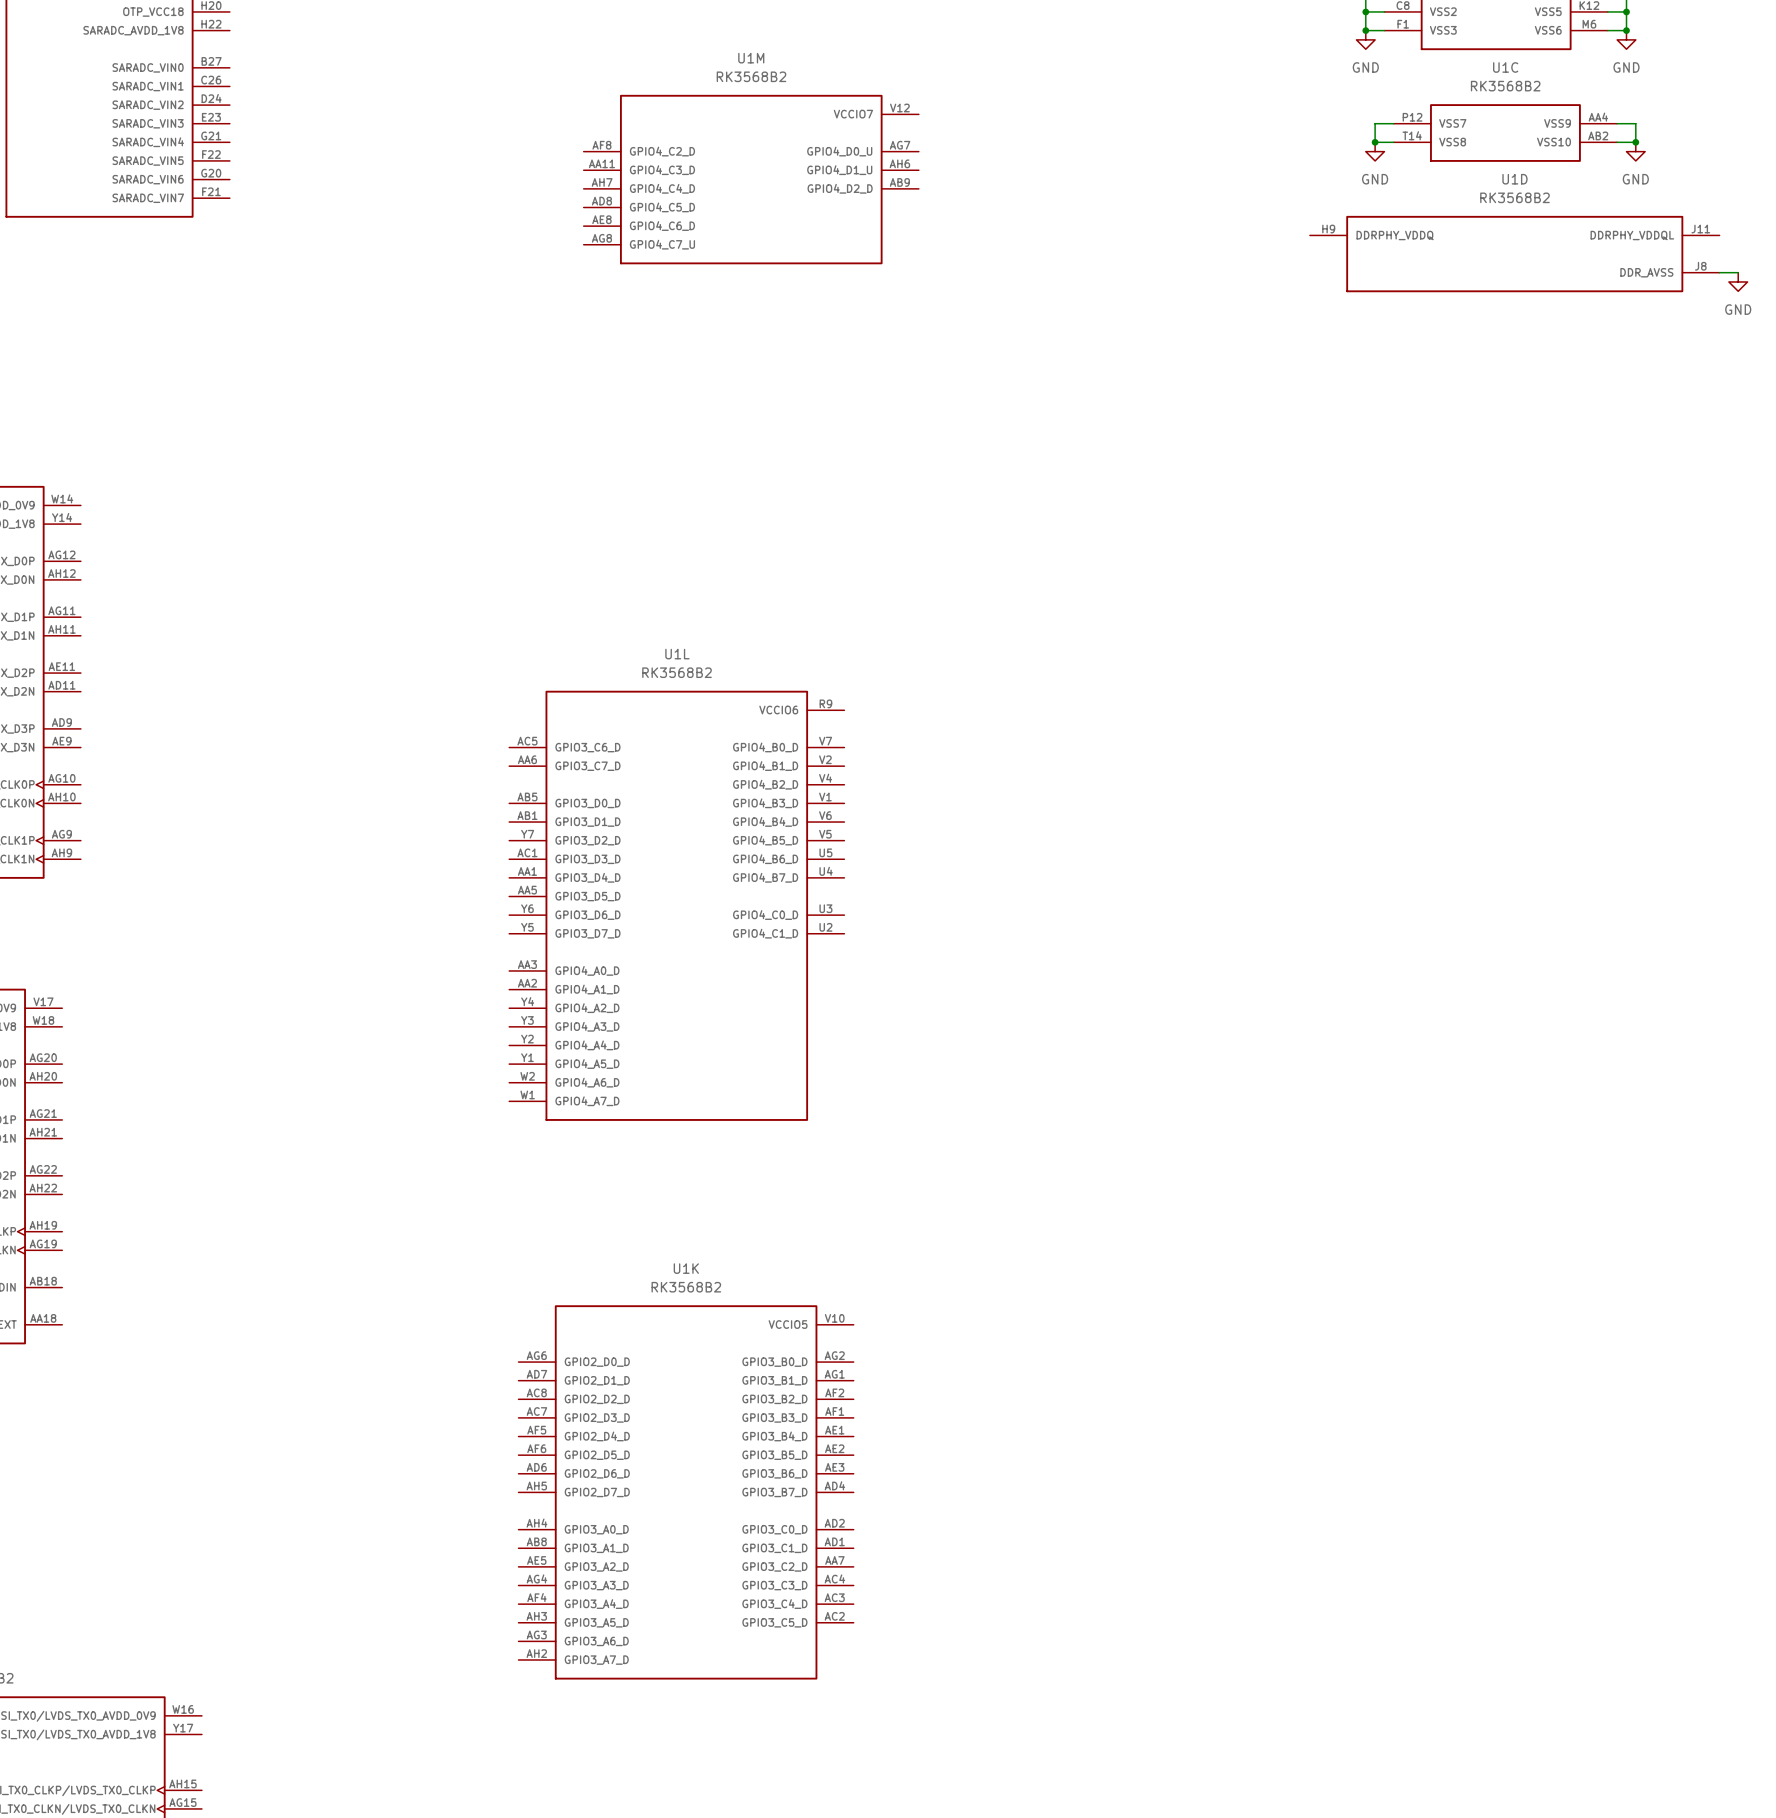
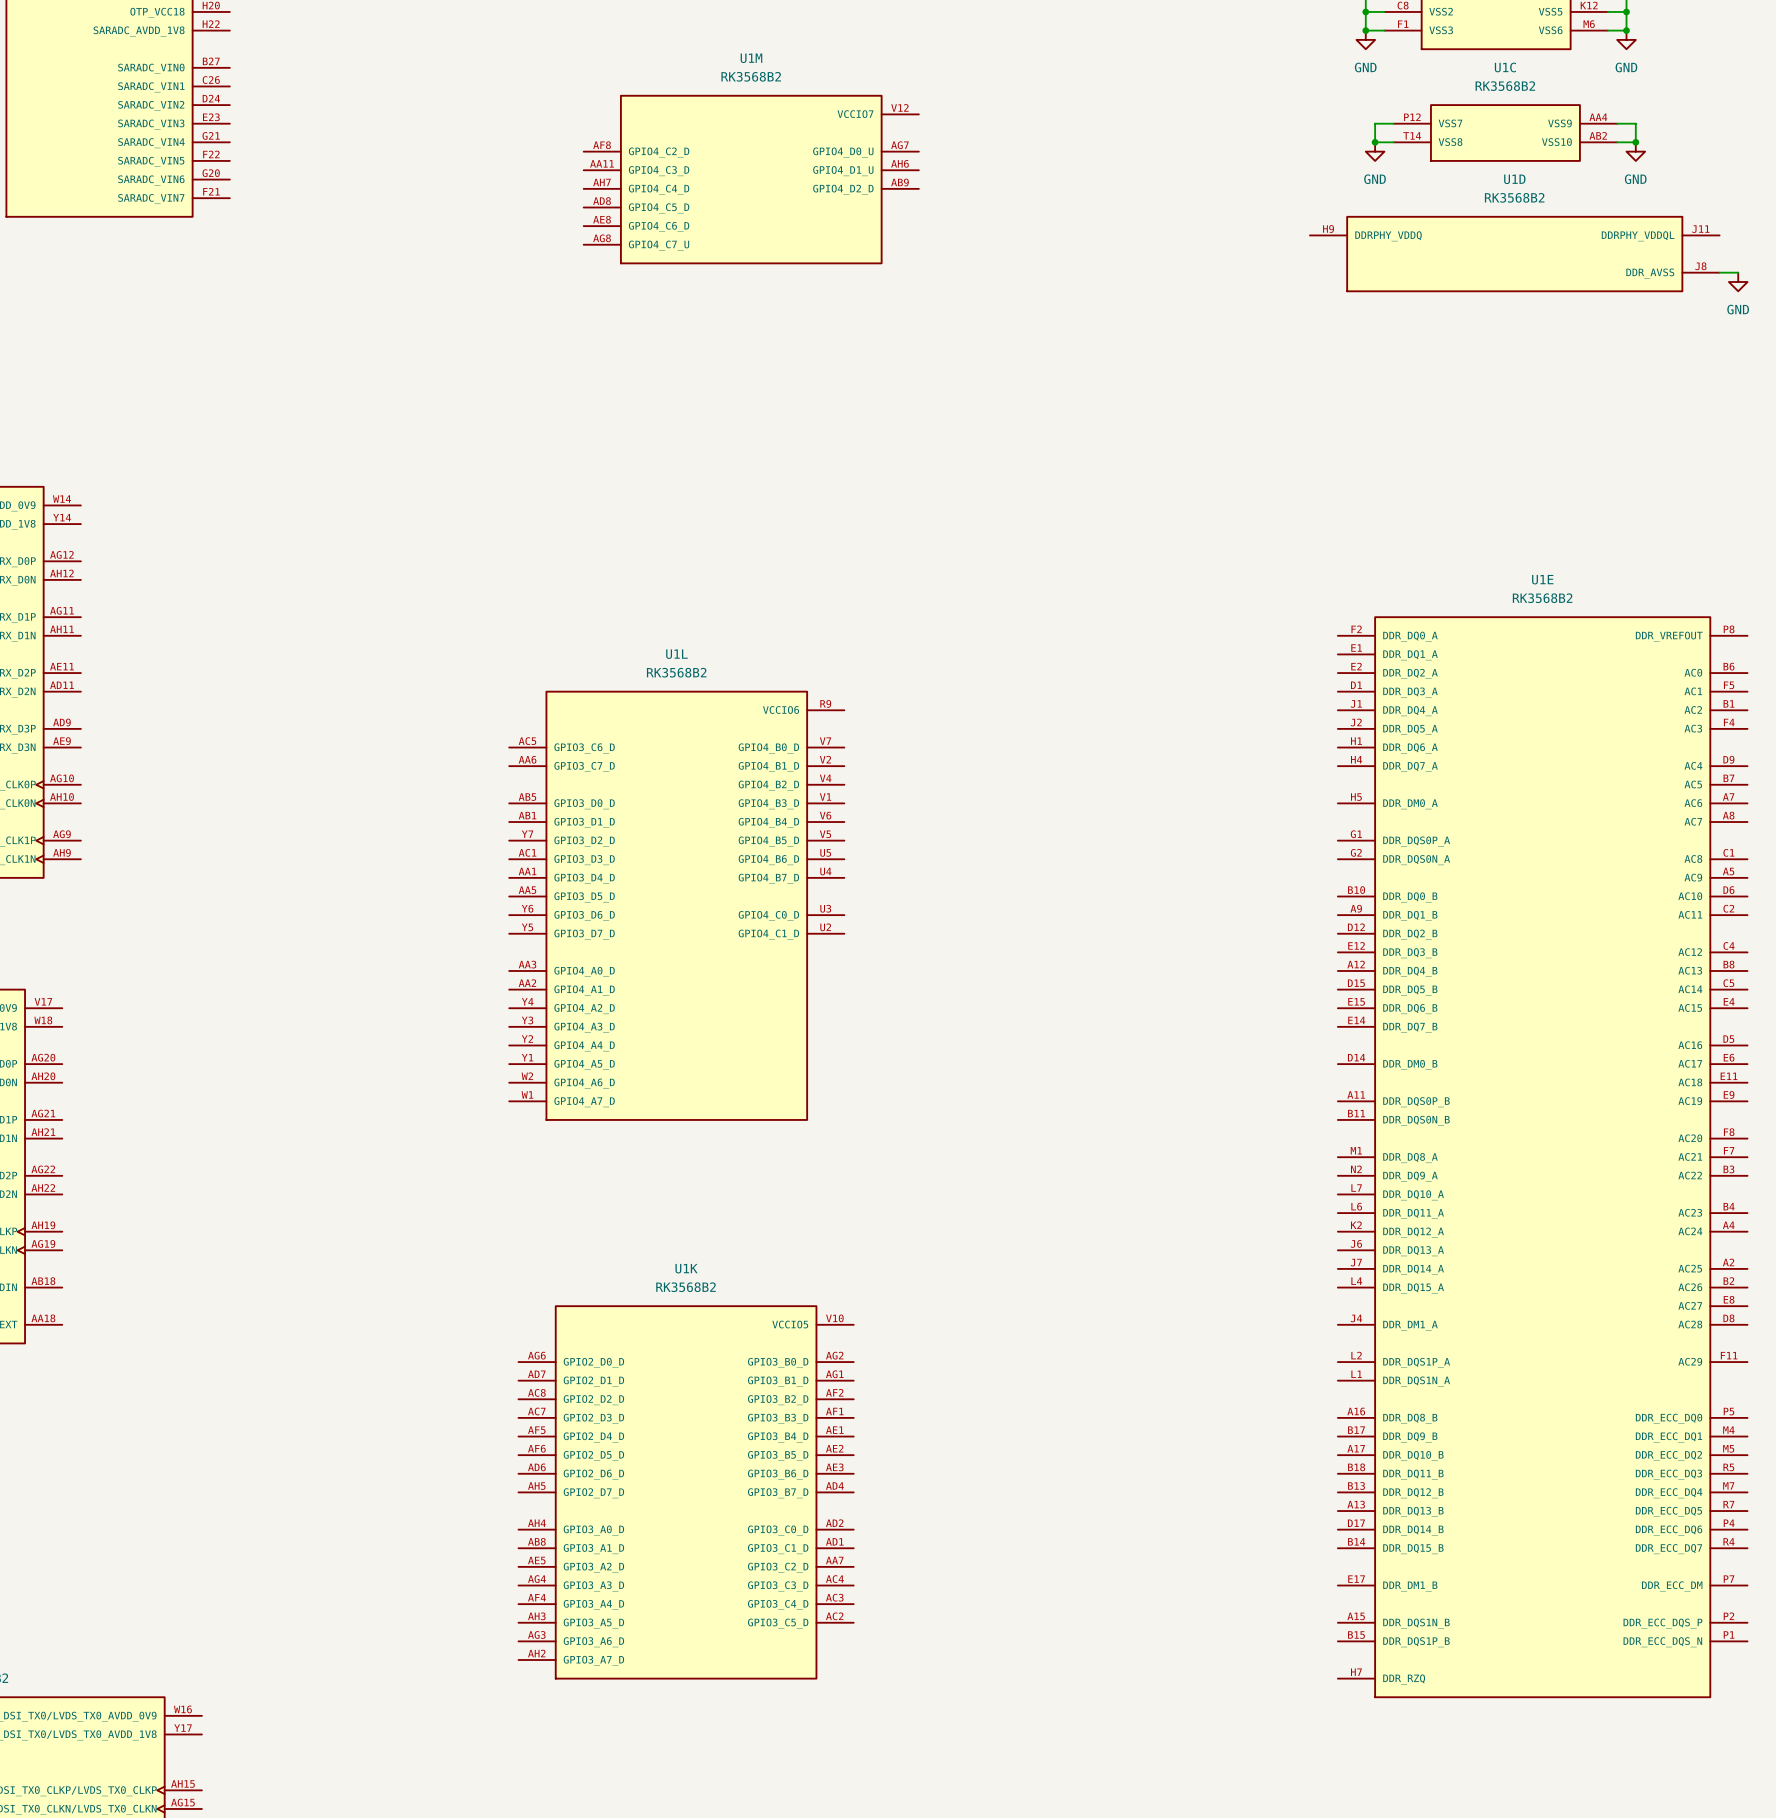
U1E: none -> RK3568B2 (1542, 1157)

